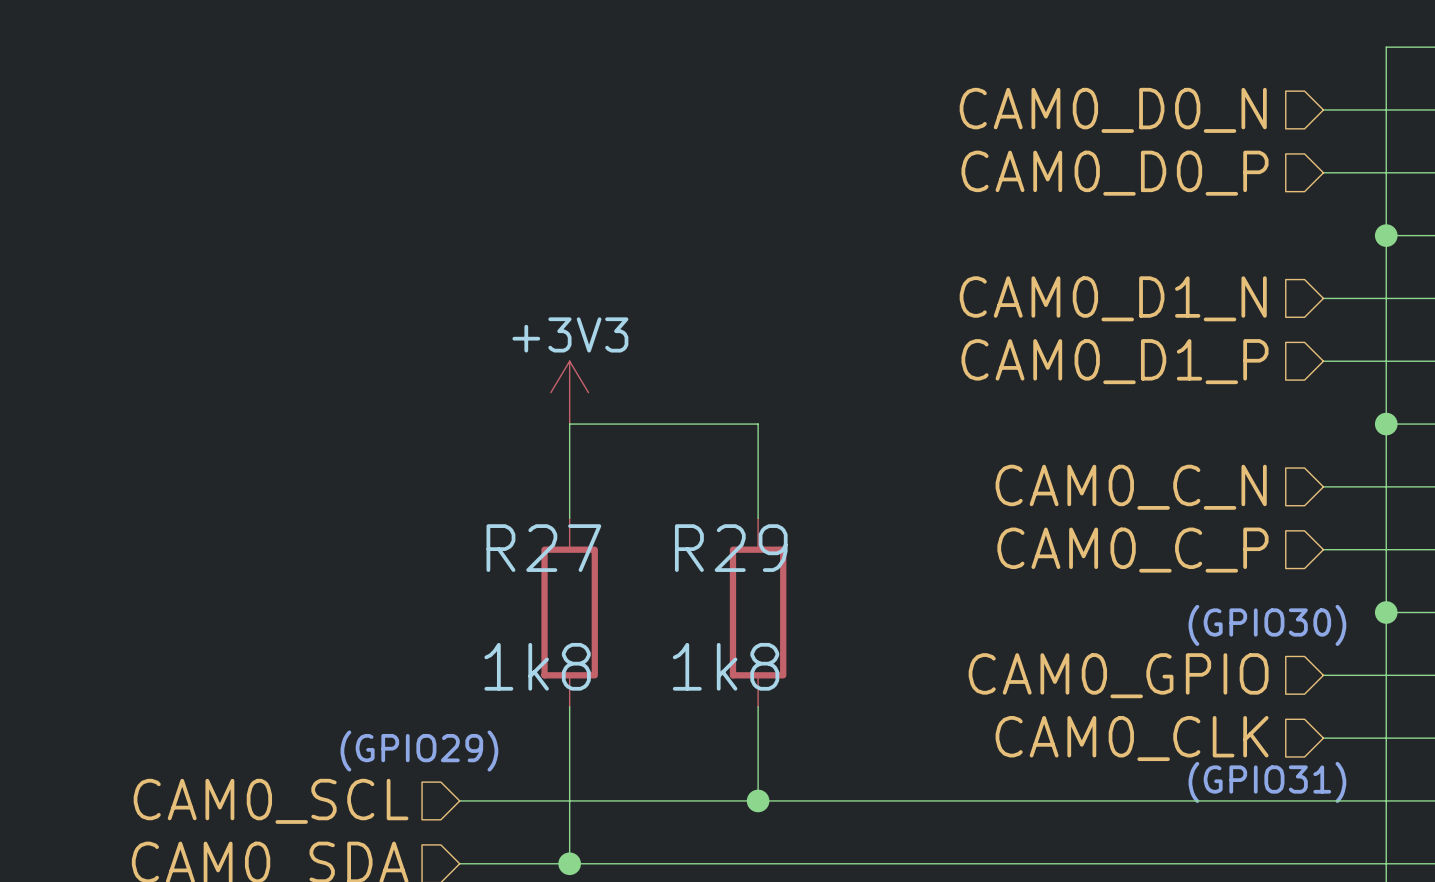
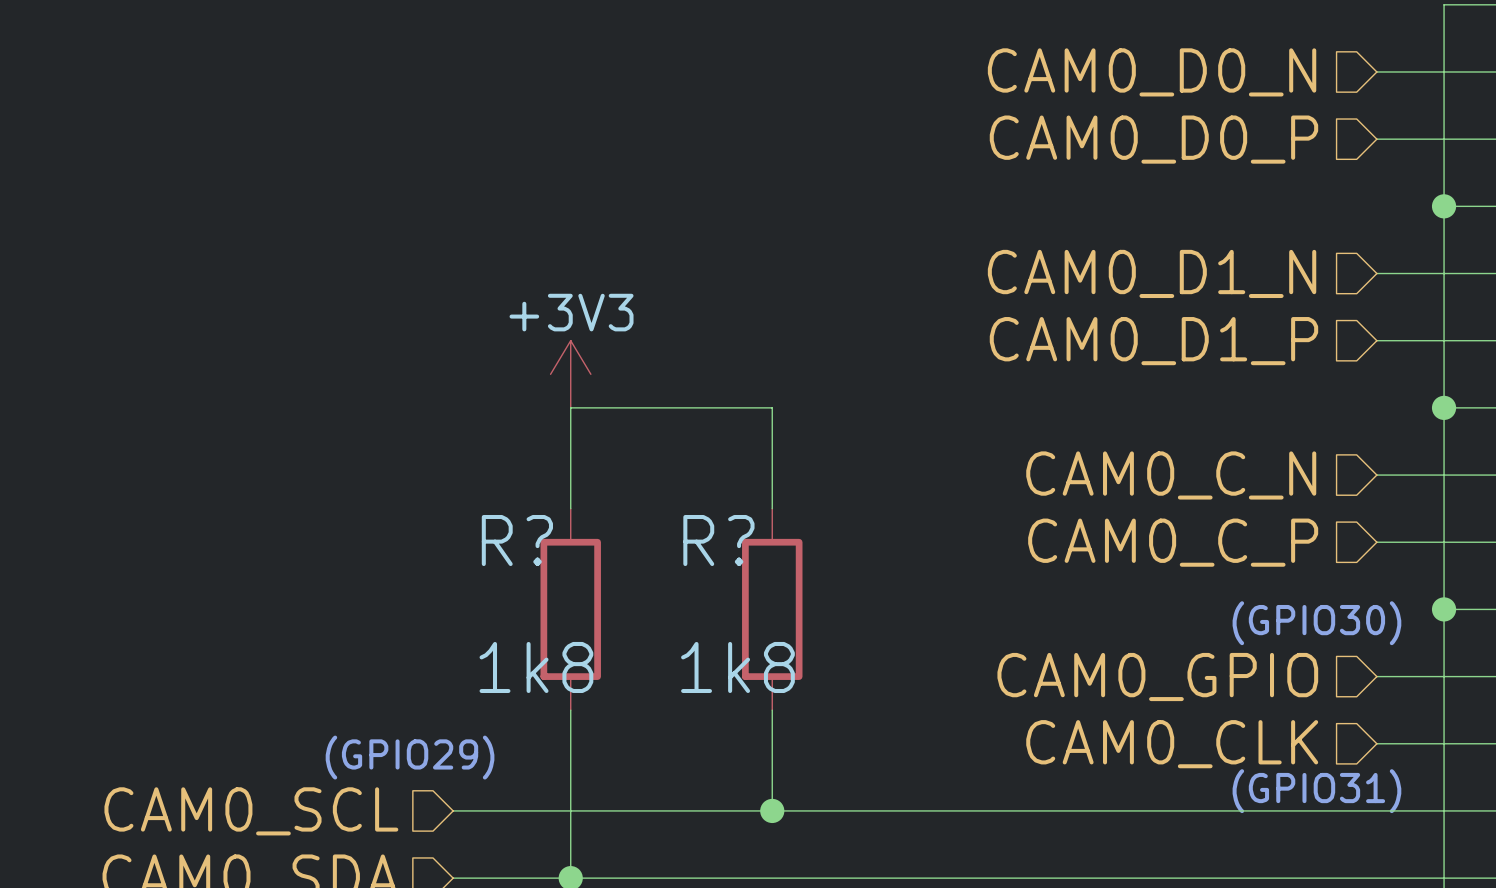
R27 name: R27 (543, 548) -> R? (517, 540)
R29 name: R29 (731, 548) -> R? (718, 540)

